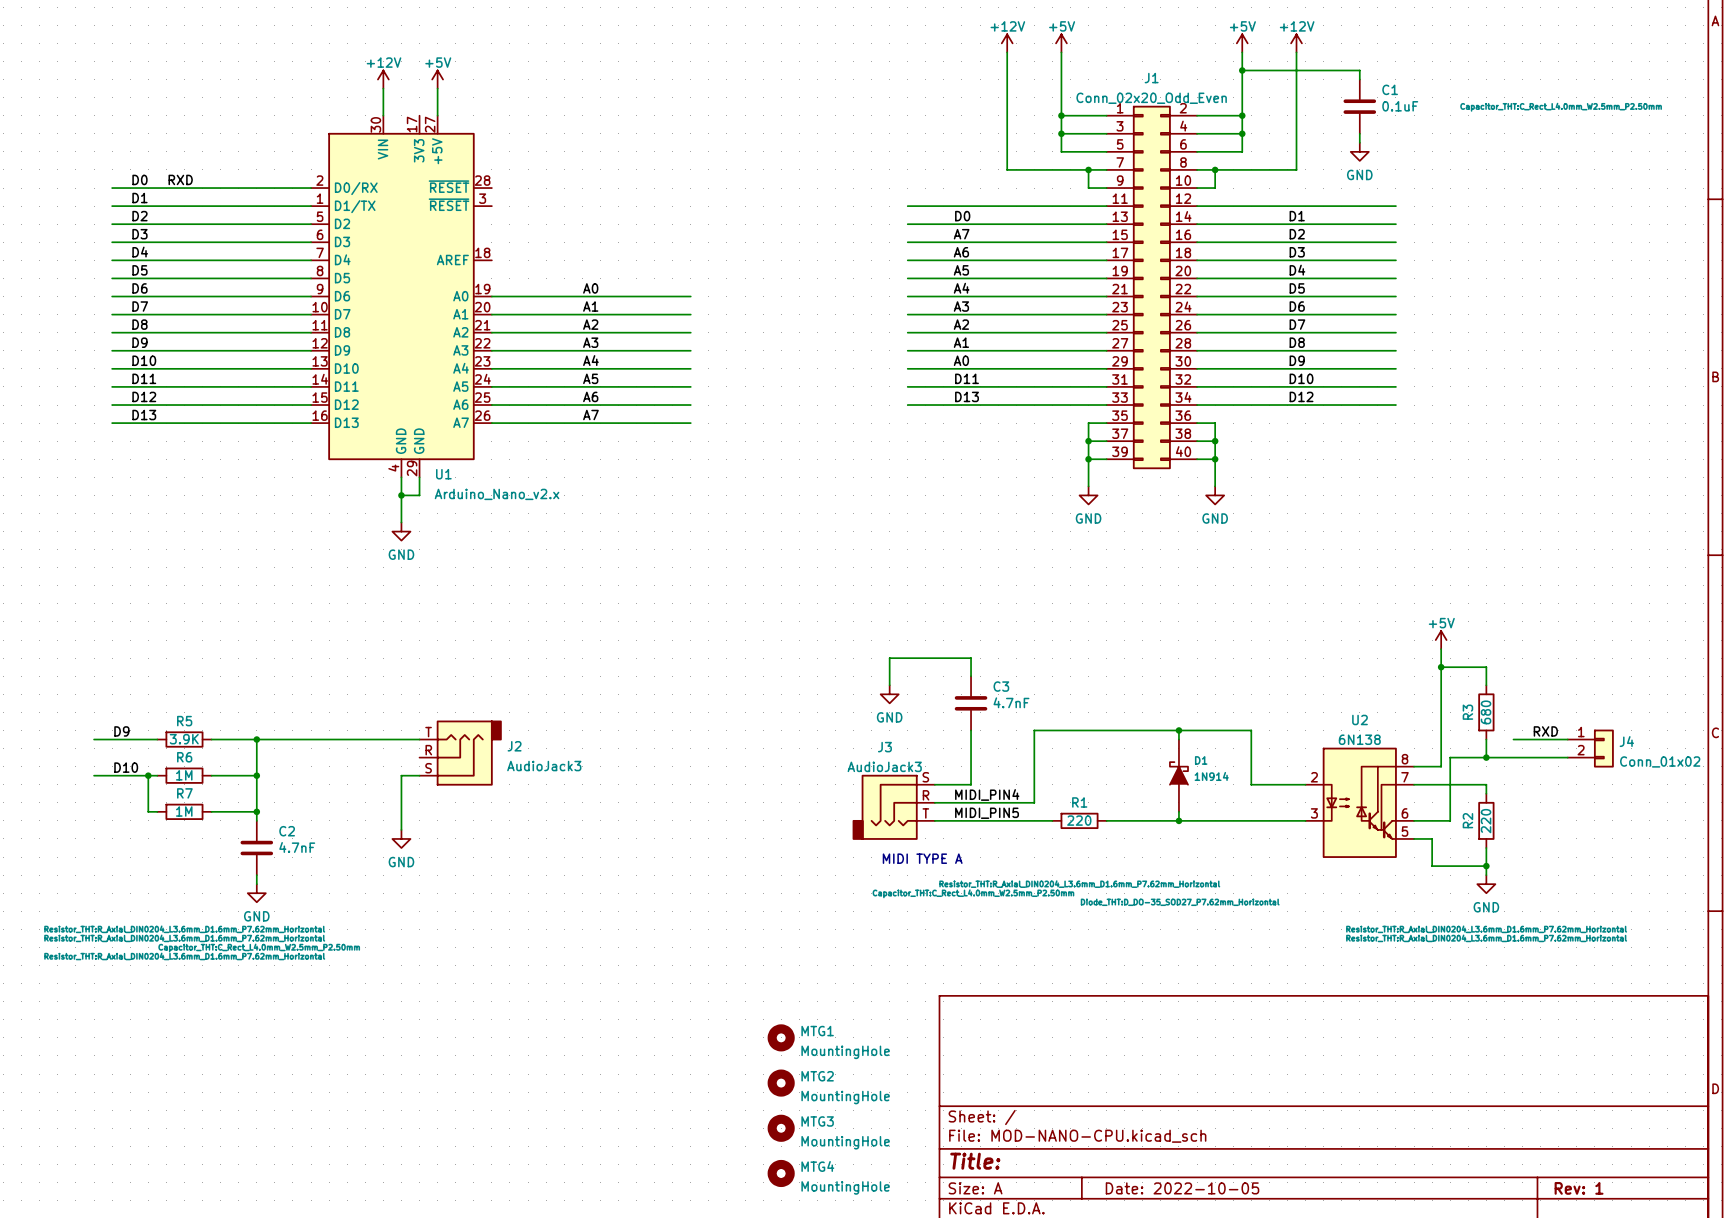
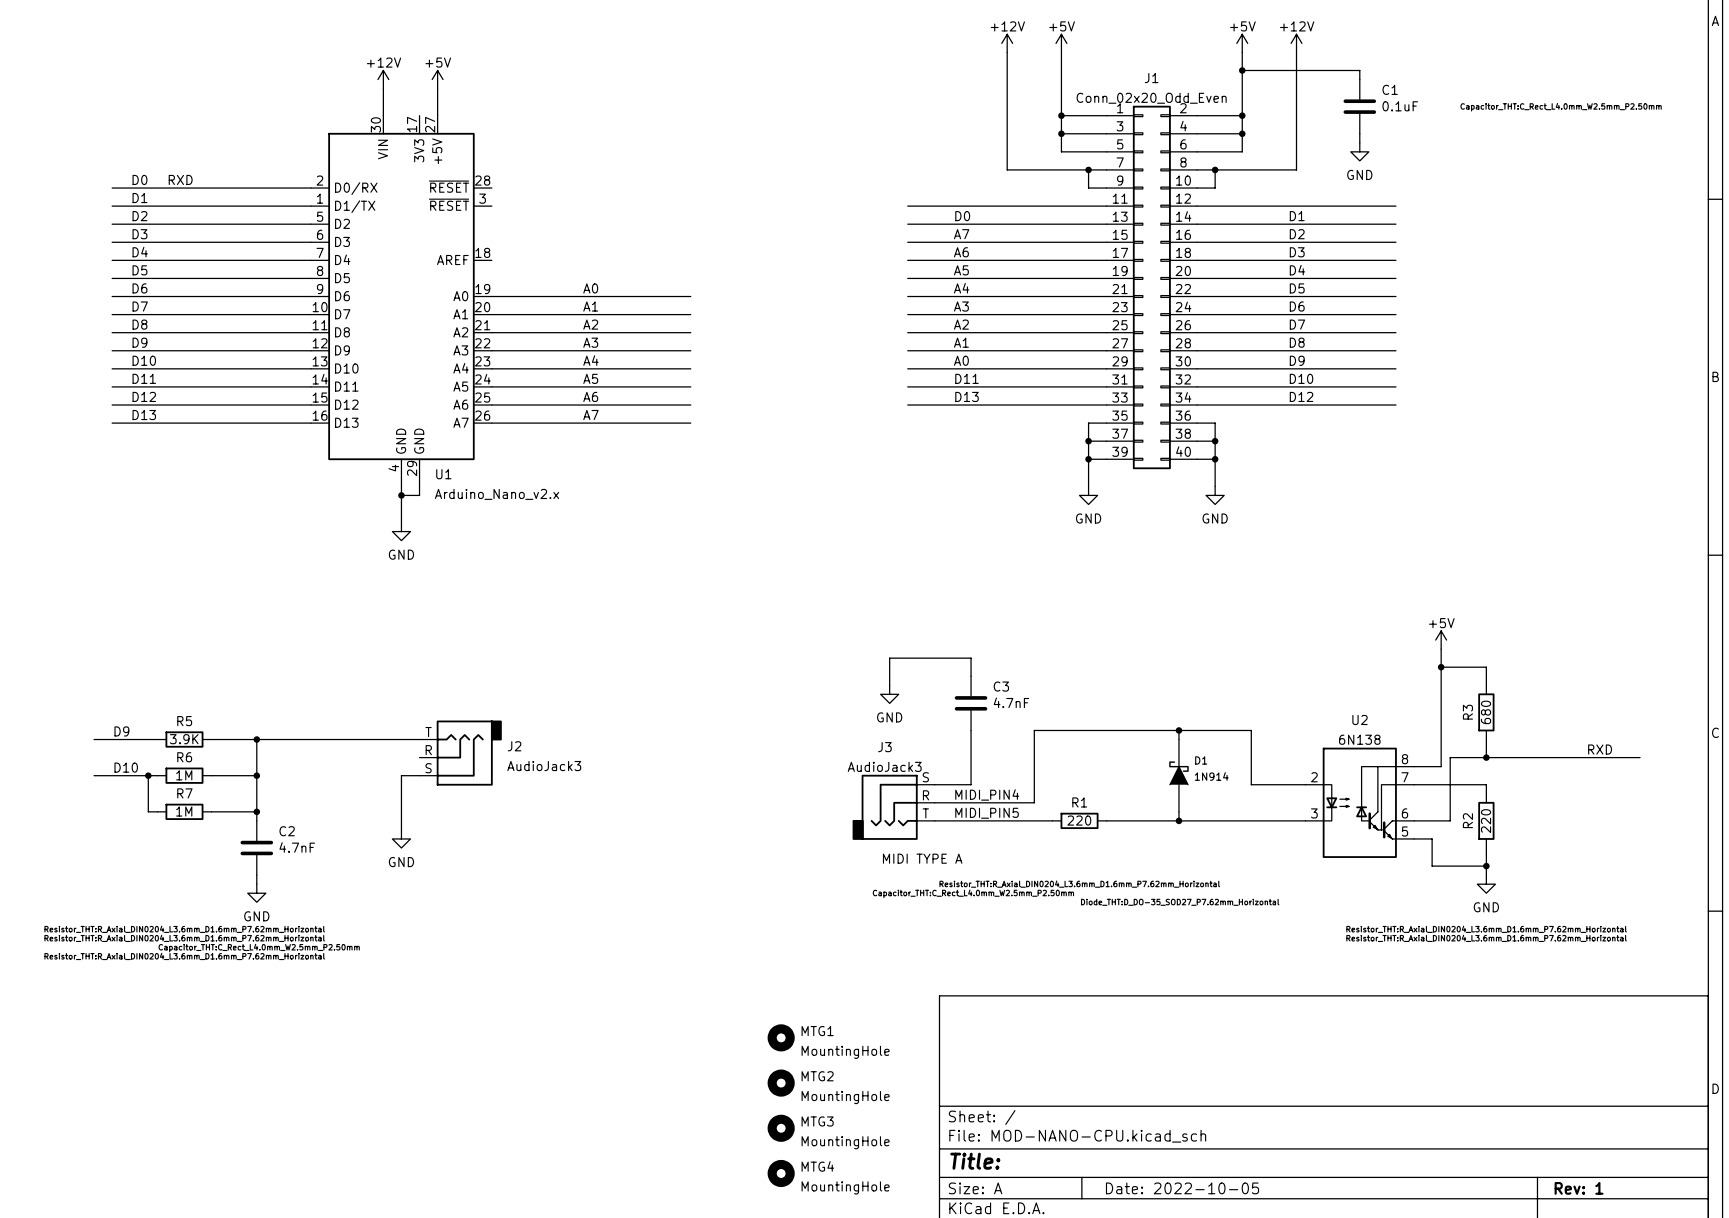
label position: RXD (1545, 731) -> RXD (1600, 749)
wire: (1513, 739) (1567, 739) -> none
J4: Conn_01x02 (1590, 748) -> none

